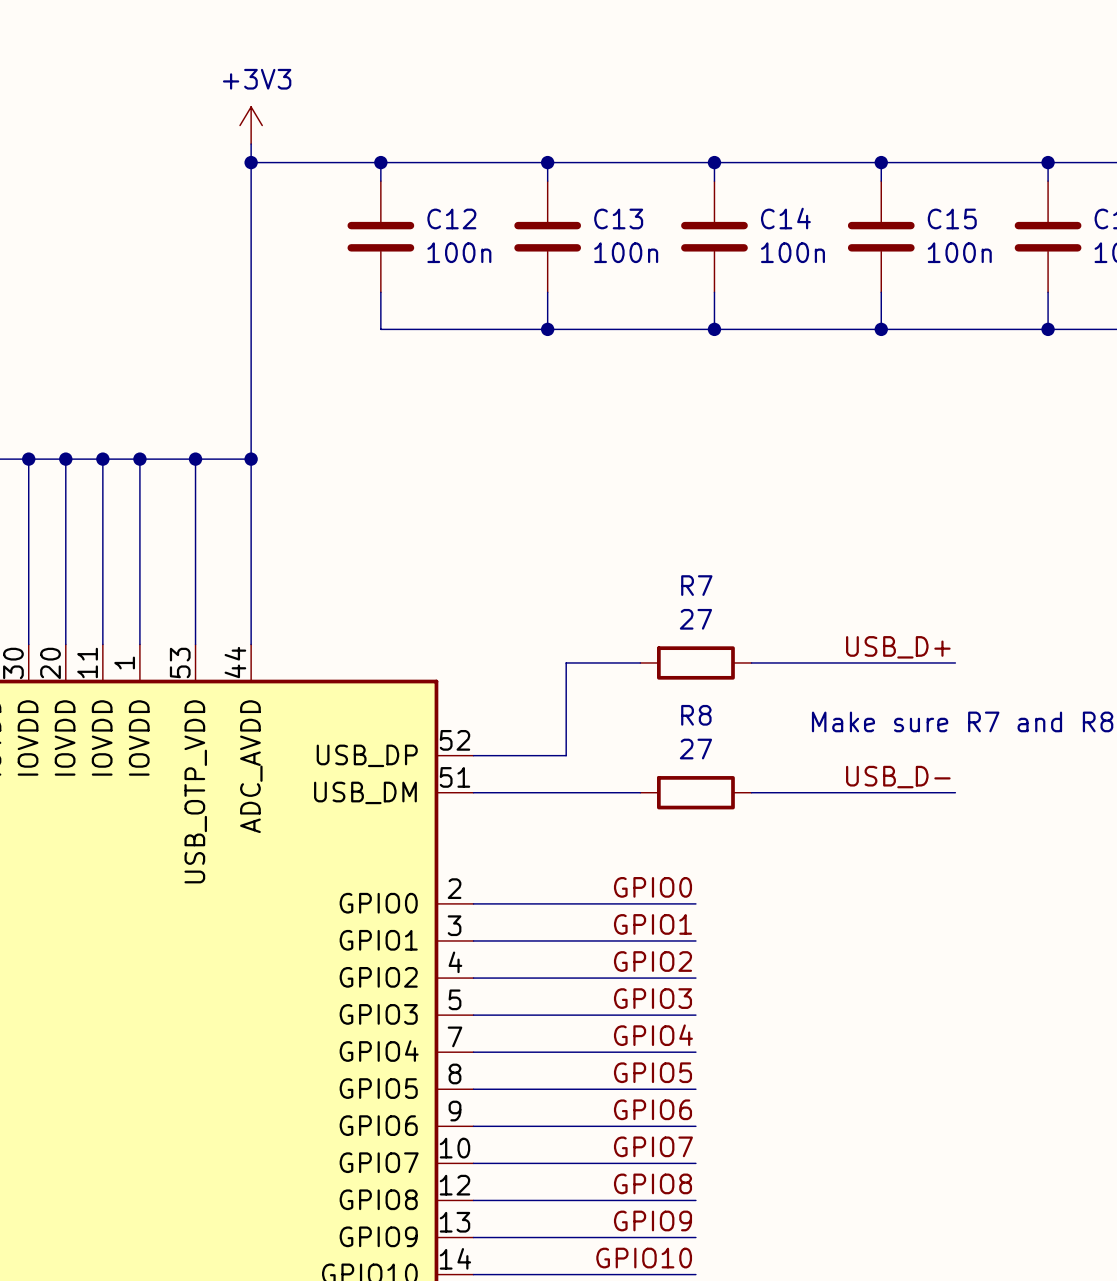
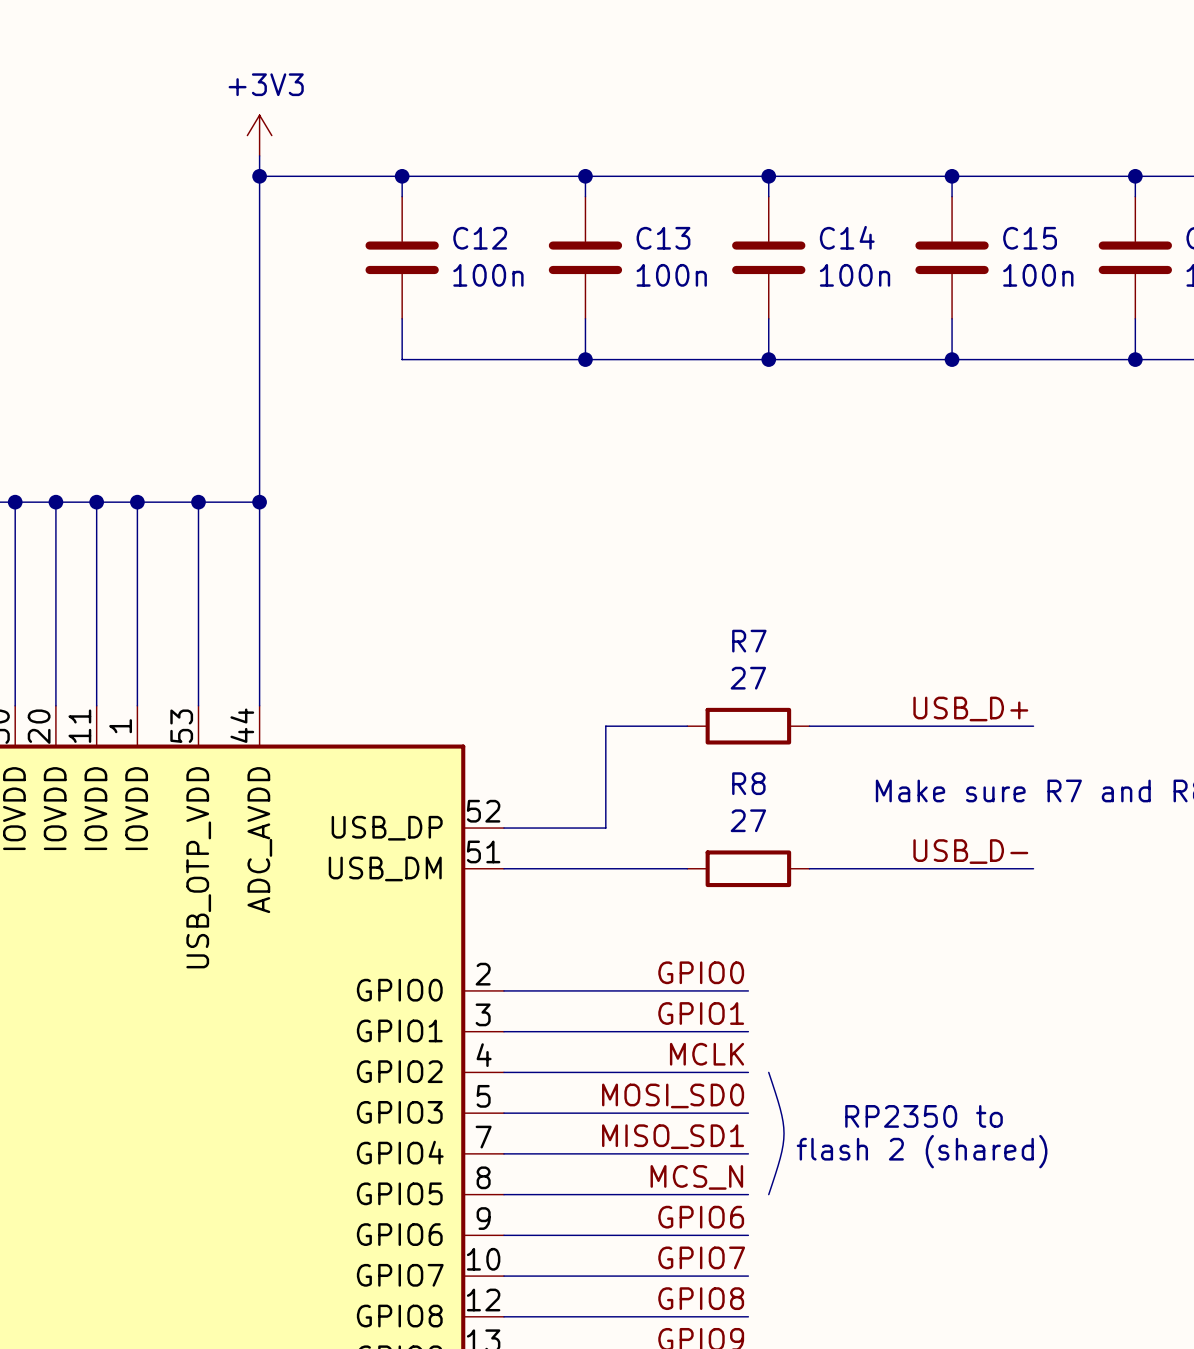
label: GPIO2 (652, 961) -> MCLK (707, 1054)
line: none -> (768, 1072) (780, 1108) (784, 1133) (780, 1158) (768, 1194)
label: GPIO3 (652, 998) -> MOSI_SD0 (673, 1095)
text: none -> RP2350 to (924, 1116)
label: GPIO4 (653, 1035) -> MISO_SD1 (673, 1136)
text: none -> flash 2 (shared) (922, 1151)
label: GPIO5 (652, 1072) -> MCS_N (696, 1177)

